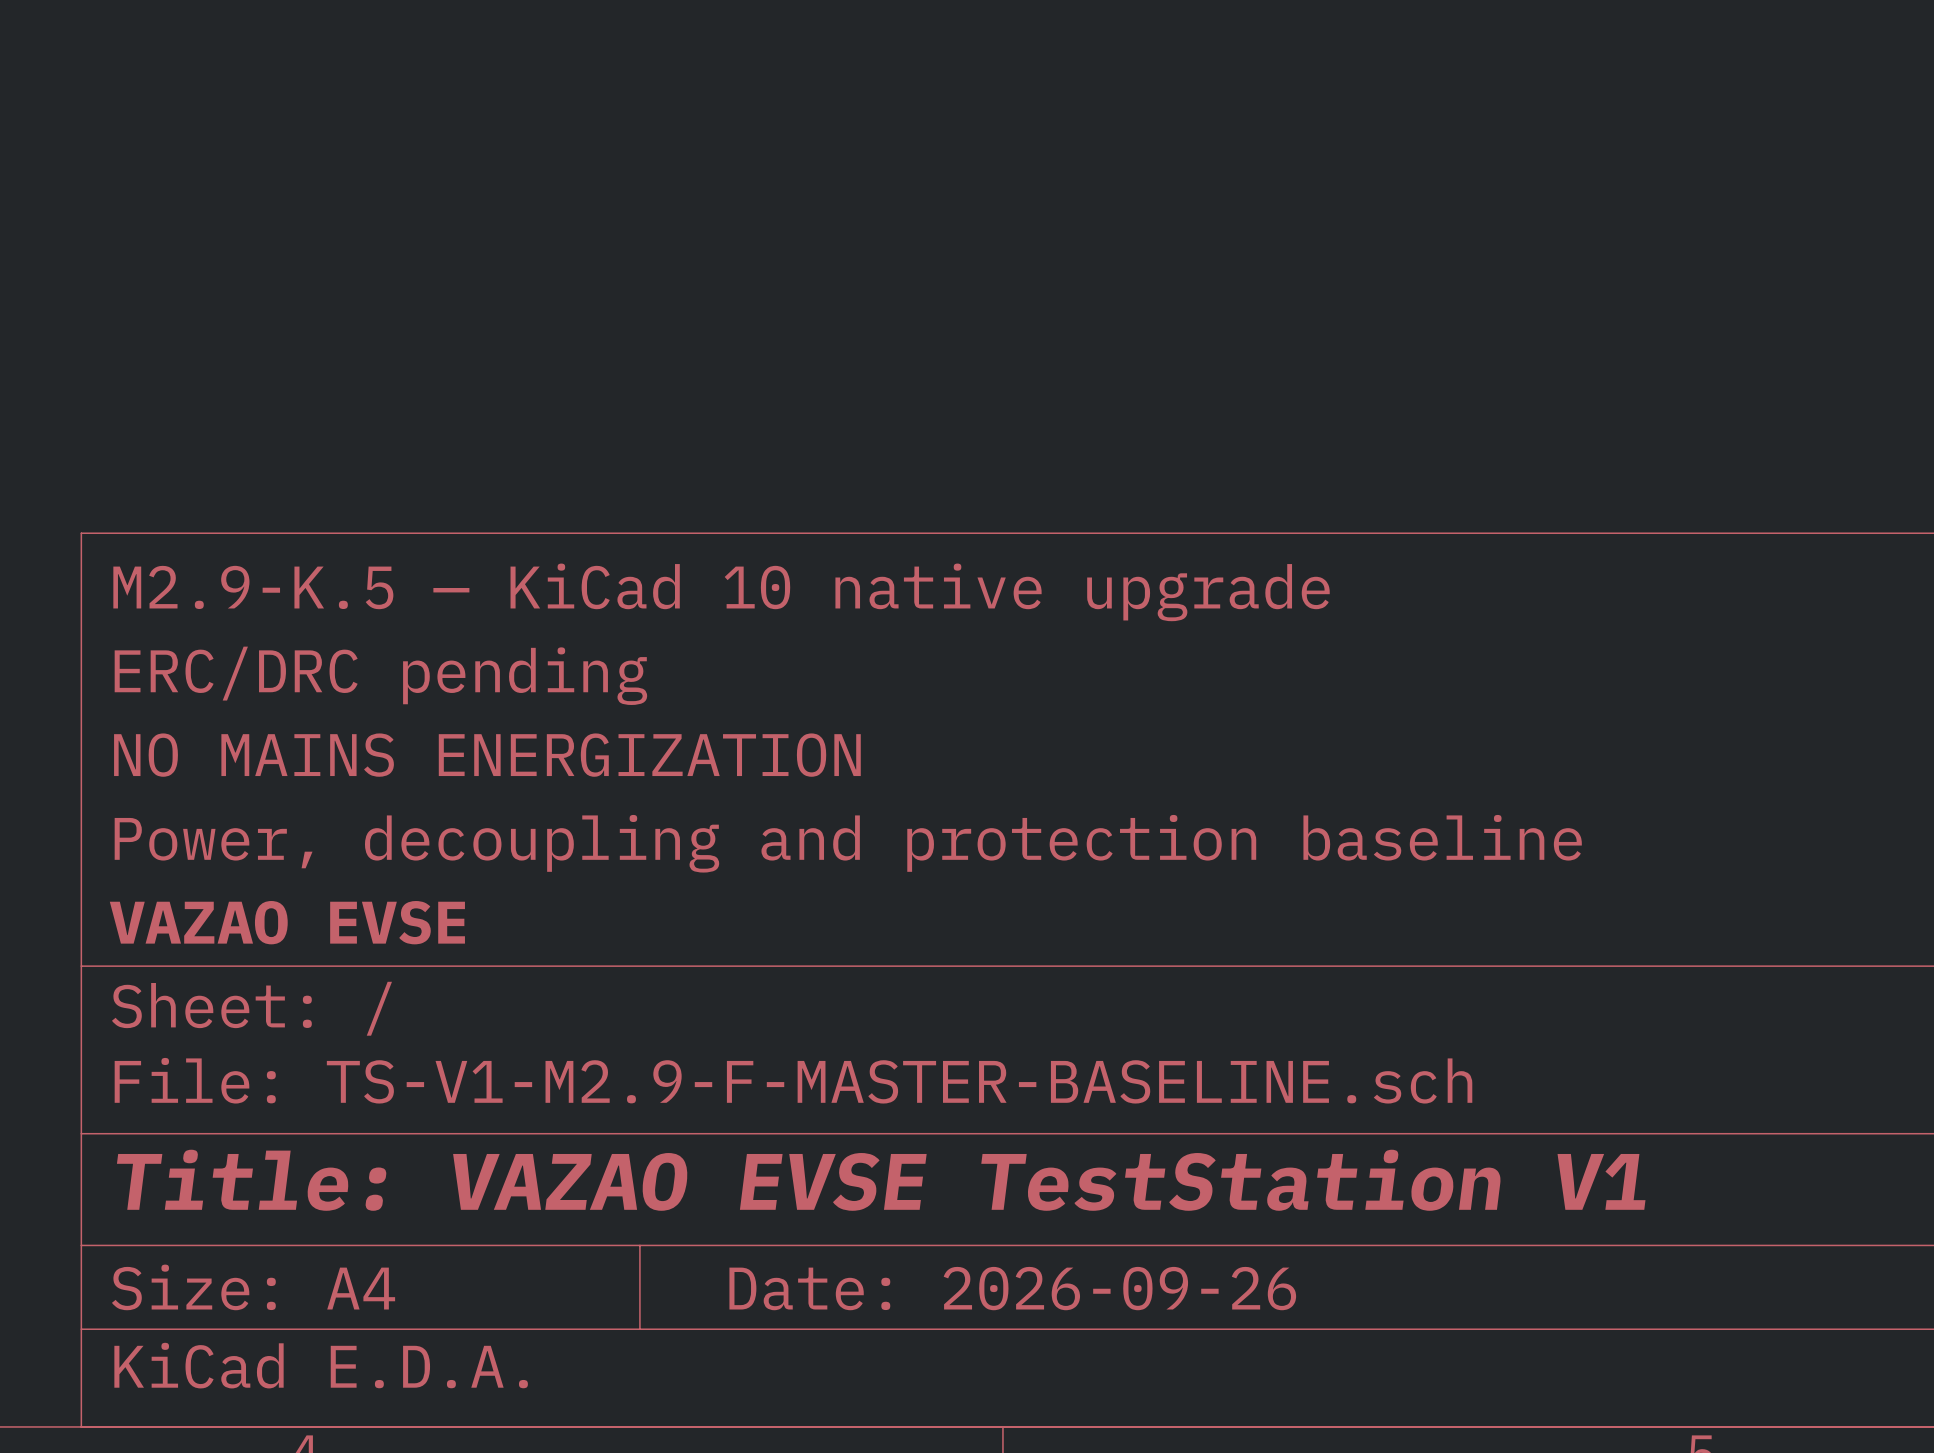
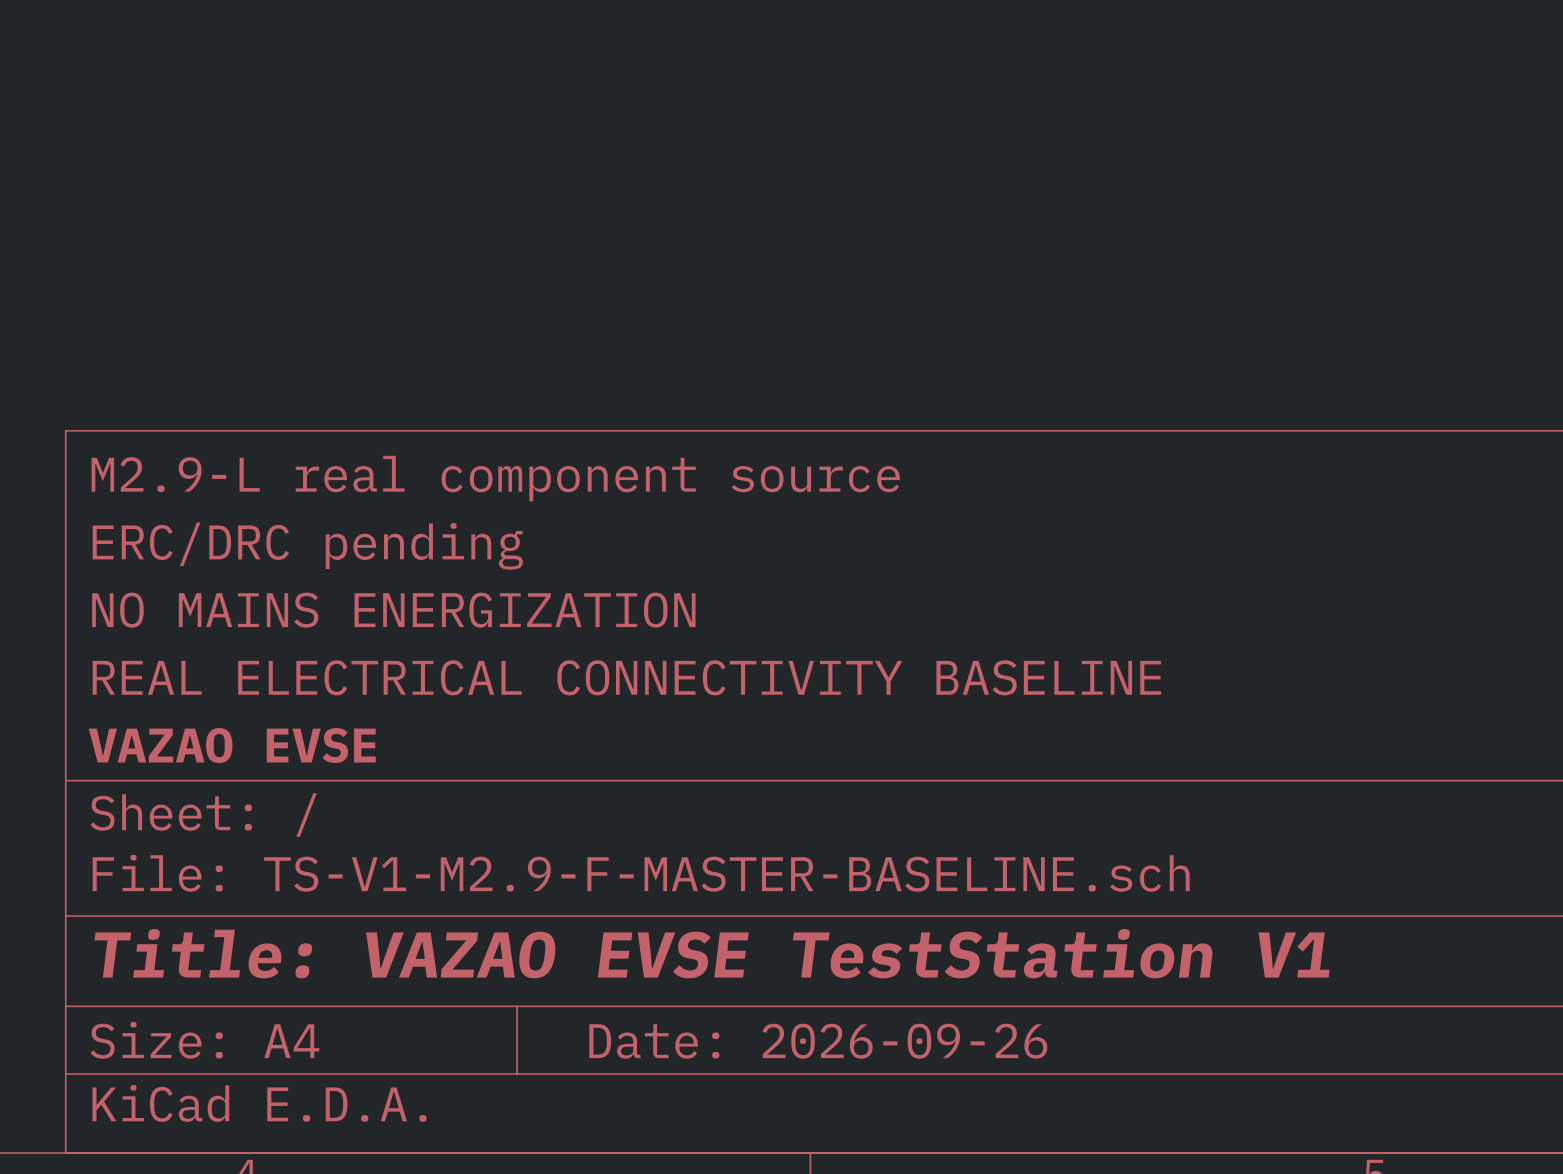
title block: M2.9-K.5 — KiCad 10 native upgrade (721, 592) -> M2.9-L real component source (495, 478)
title block: Power, decoupling and protection baseline (848, 843) -> REAL ELECTRICAL CONNECTIVITY BASELINE (626, 677)

